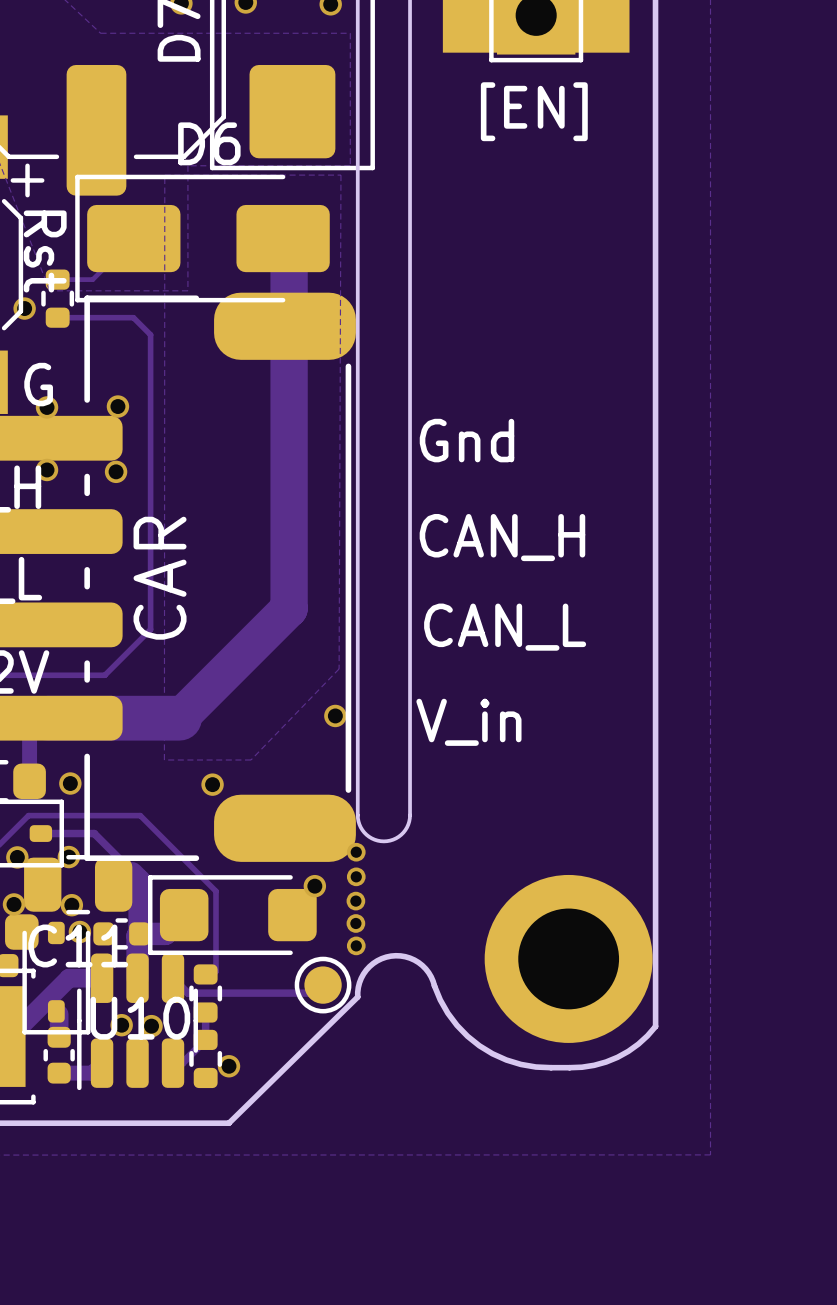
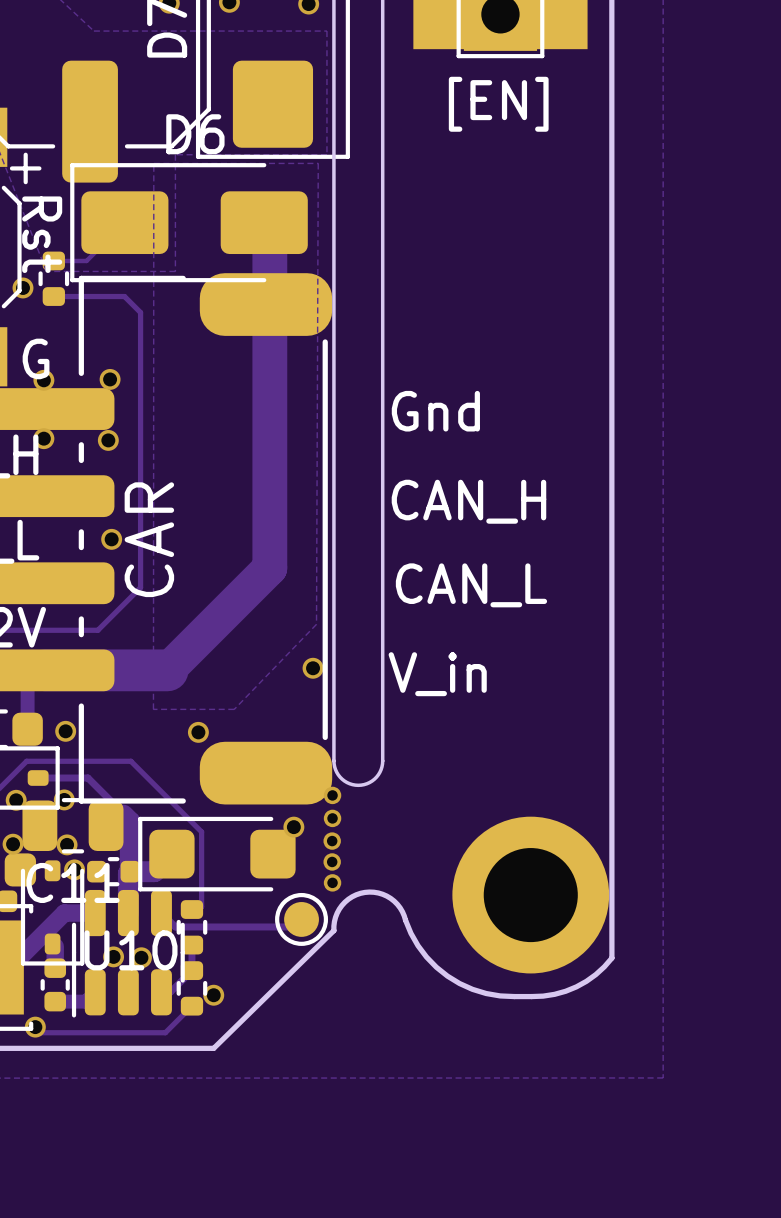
via: none -> (111, 539)
track: none -> (191, 1006) (165, 1032) (40, 1032) (35, 1027)
via: none -> (35, 1027)

